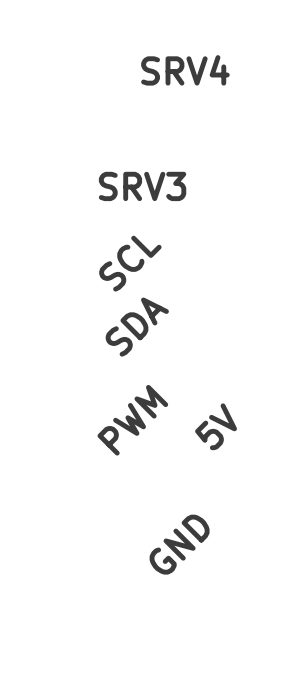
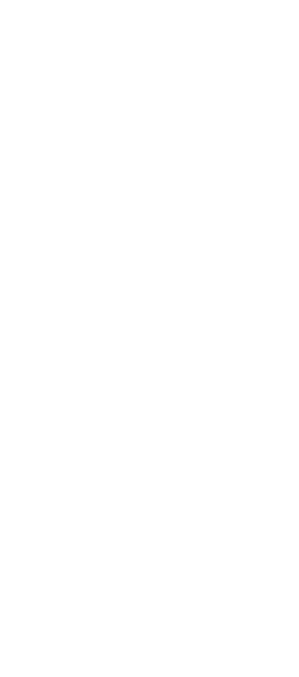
text: SRV4 (185, 70) -> none
text: SRV3 (142, 186) -> none
text: SCL (130, 263) -> none
text: SDA (137, 327) -> none
text: PWM (132, 420) -> none
text: 5V (216, 426) -> none
text: GND (179, 544) -> none

